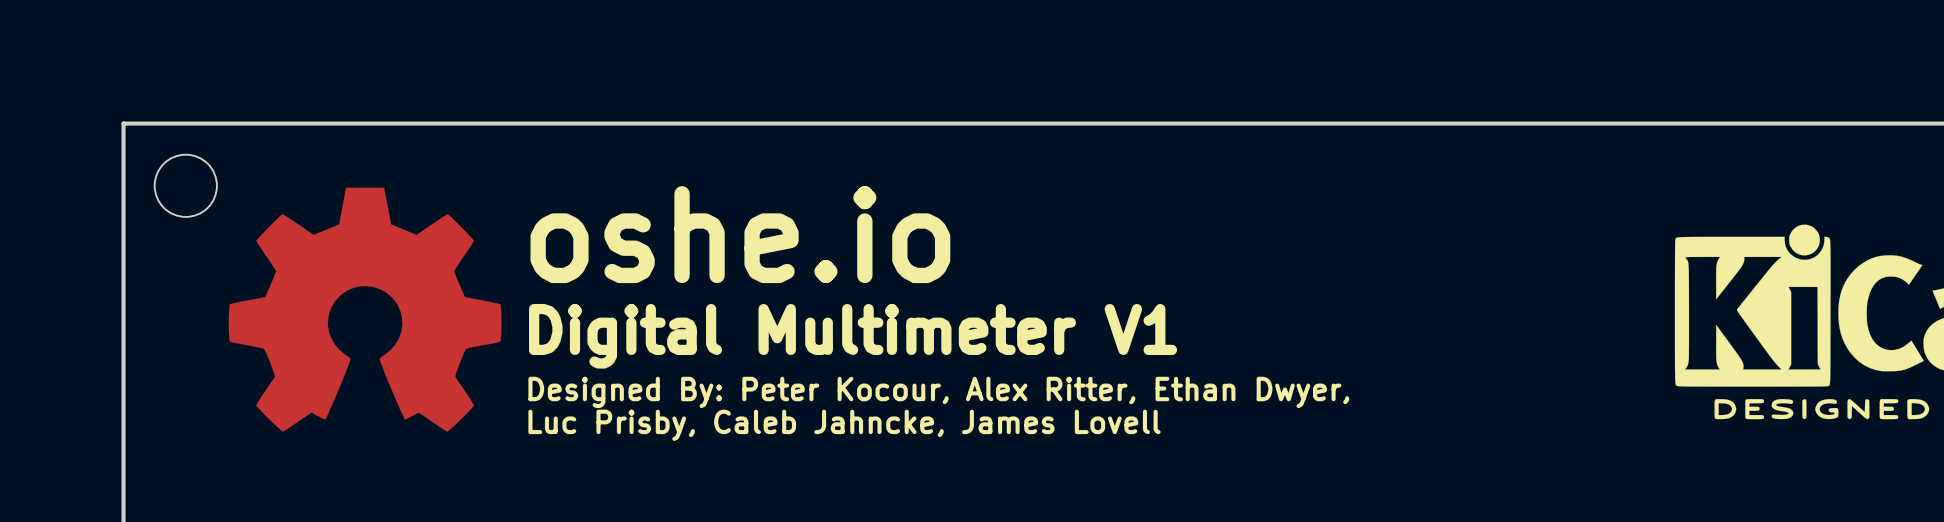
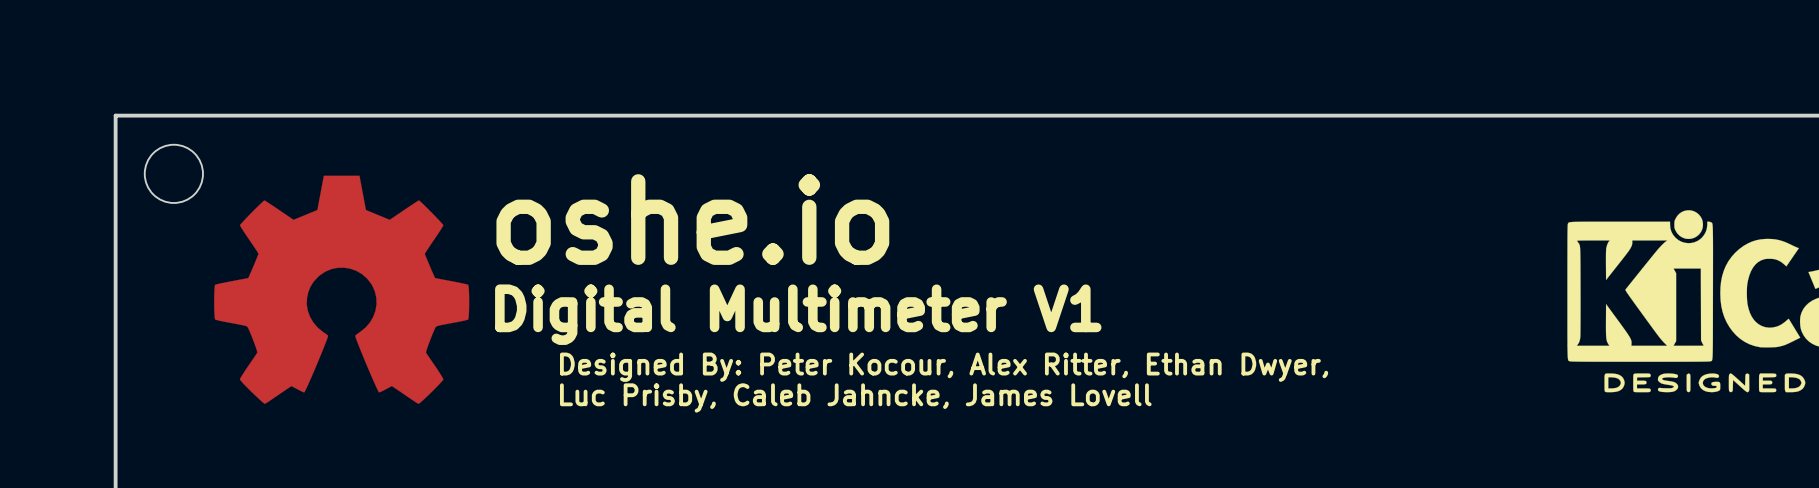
text position: Designed By: Peter Kocour, Alex Ritter, Ethan Dwyer, (938, 392) -> Designed By: Peter Kocour, Alex Ritter, Ethan Dwyer, (944, 367)
text position: Luc Prisby, Caleb Jahncke, James Lovell (844, 425) -> Luc Prisby, Caleb Jahncke, James Lovell (855, 397)

